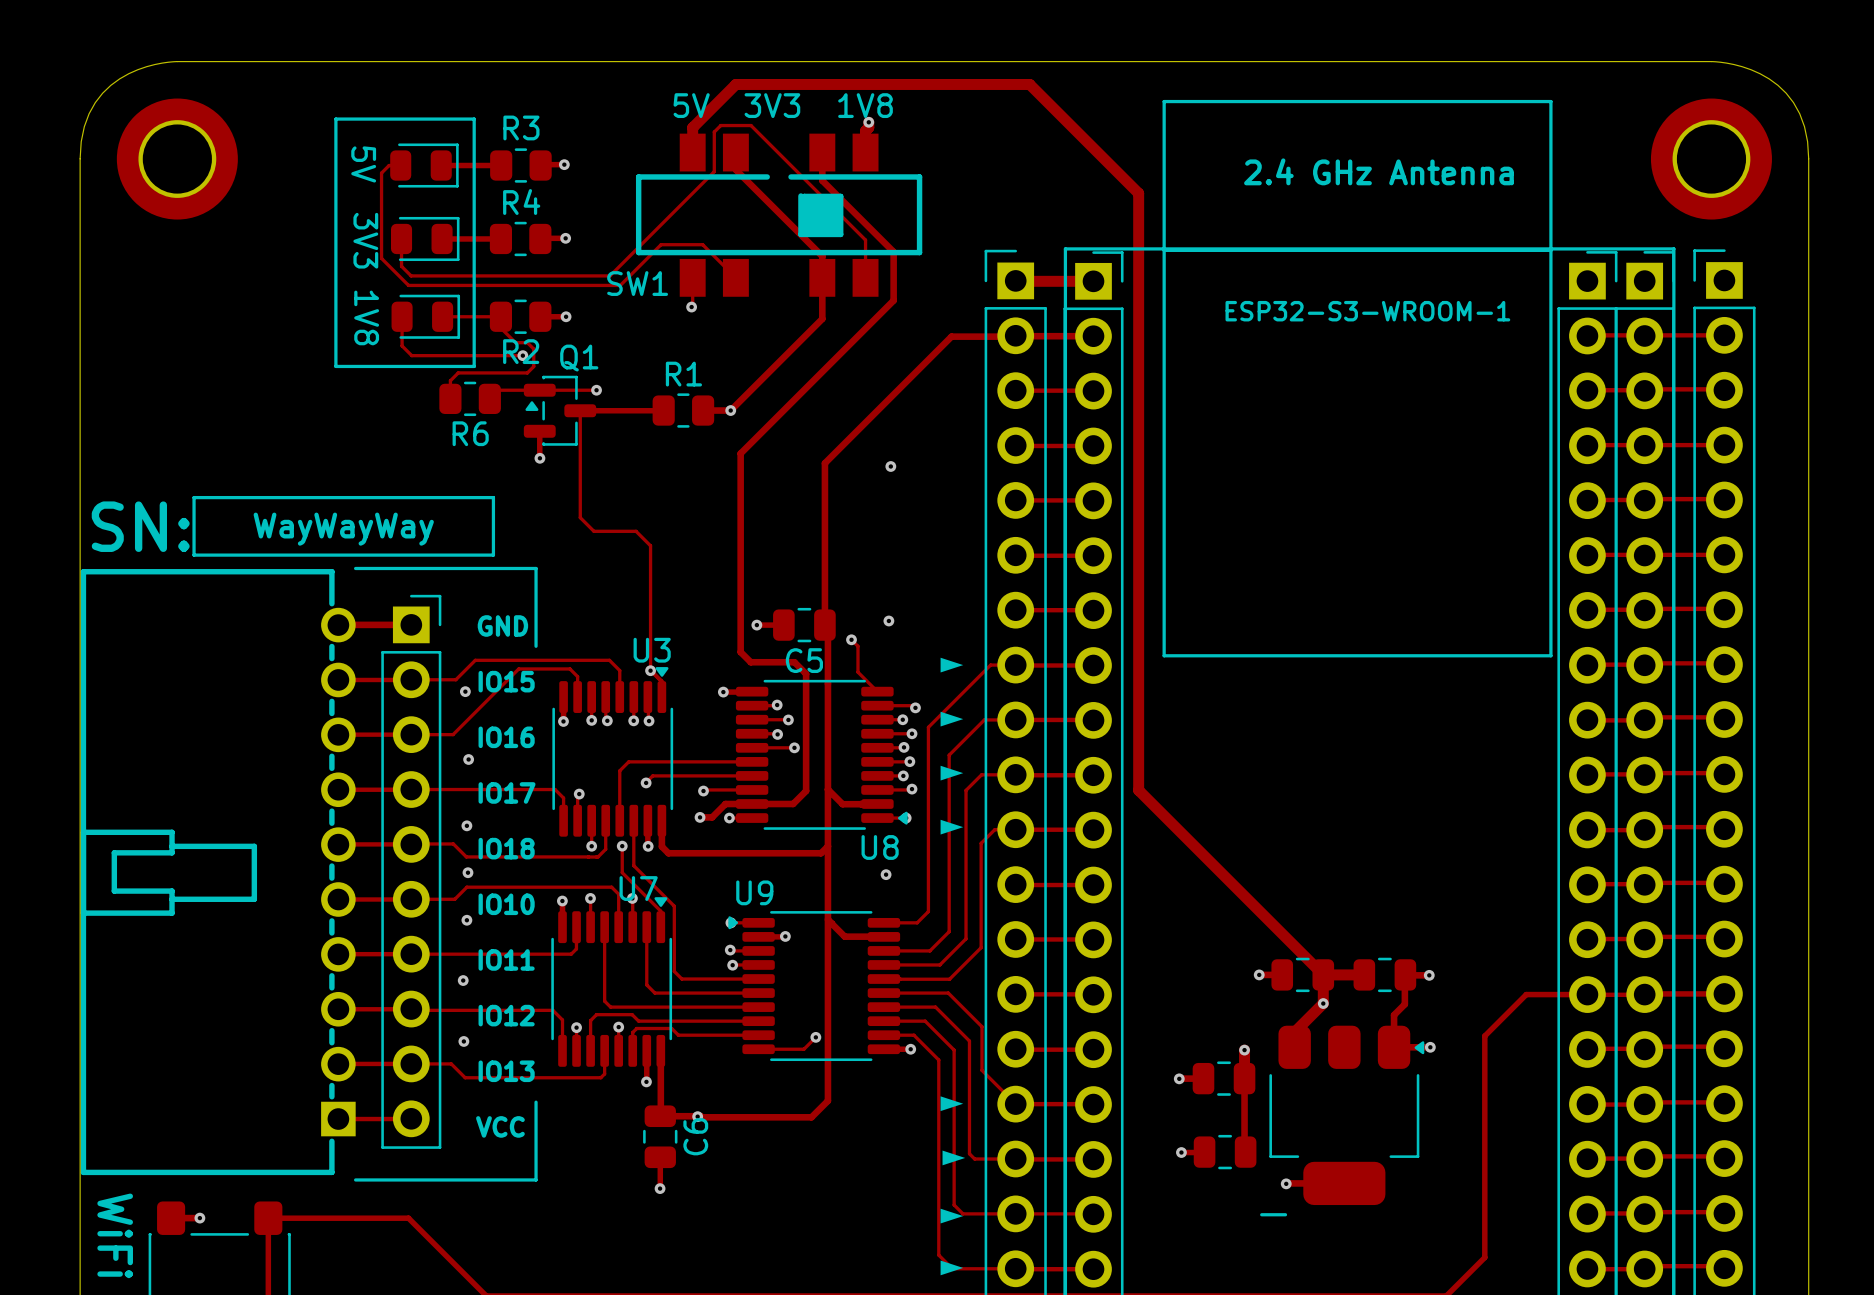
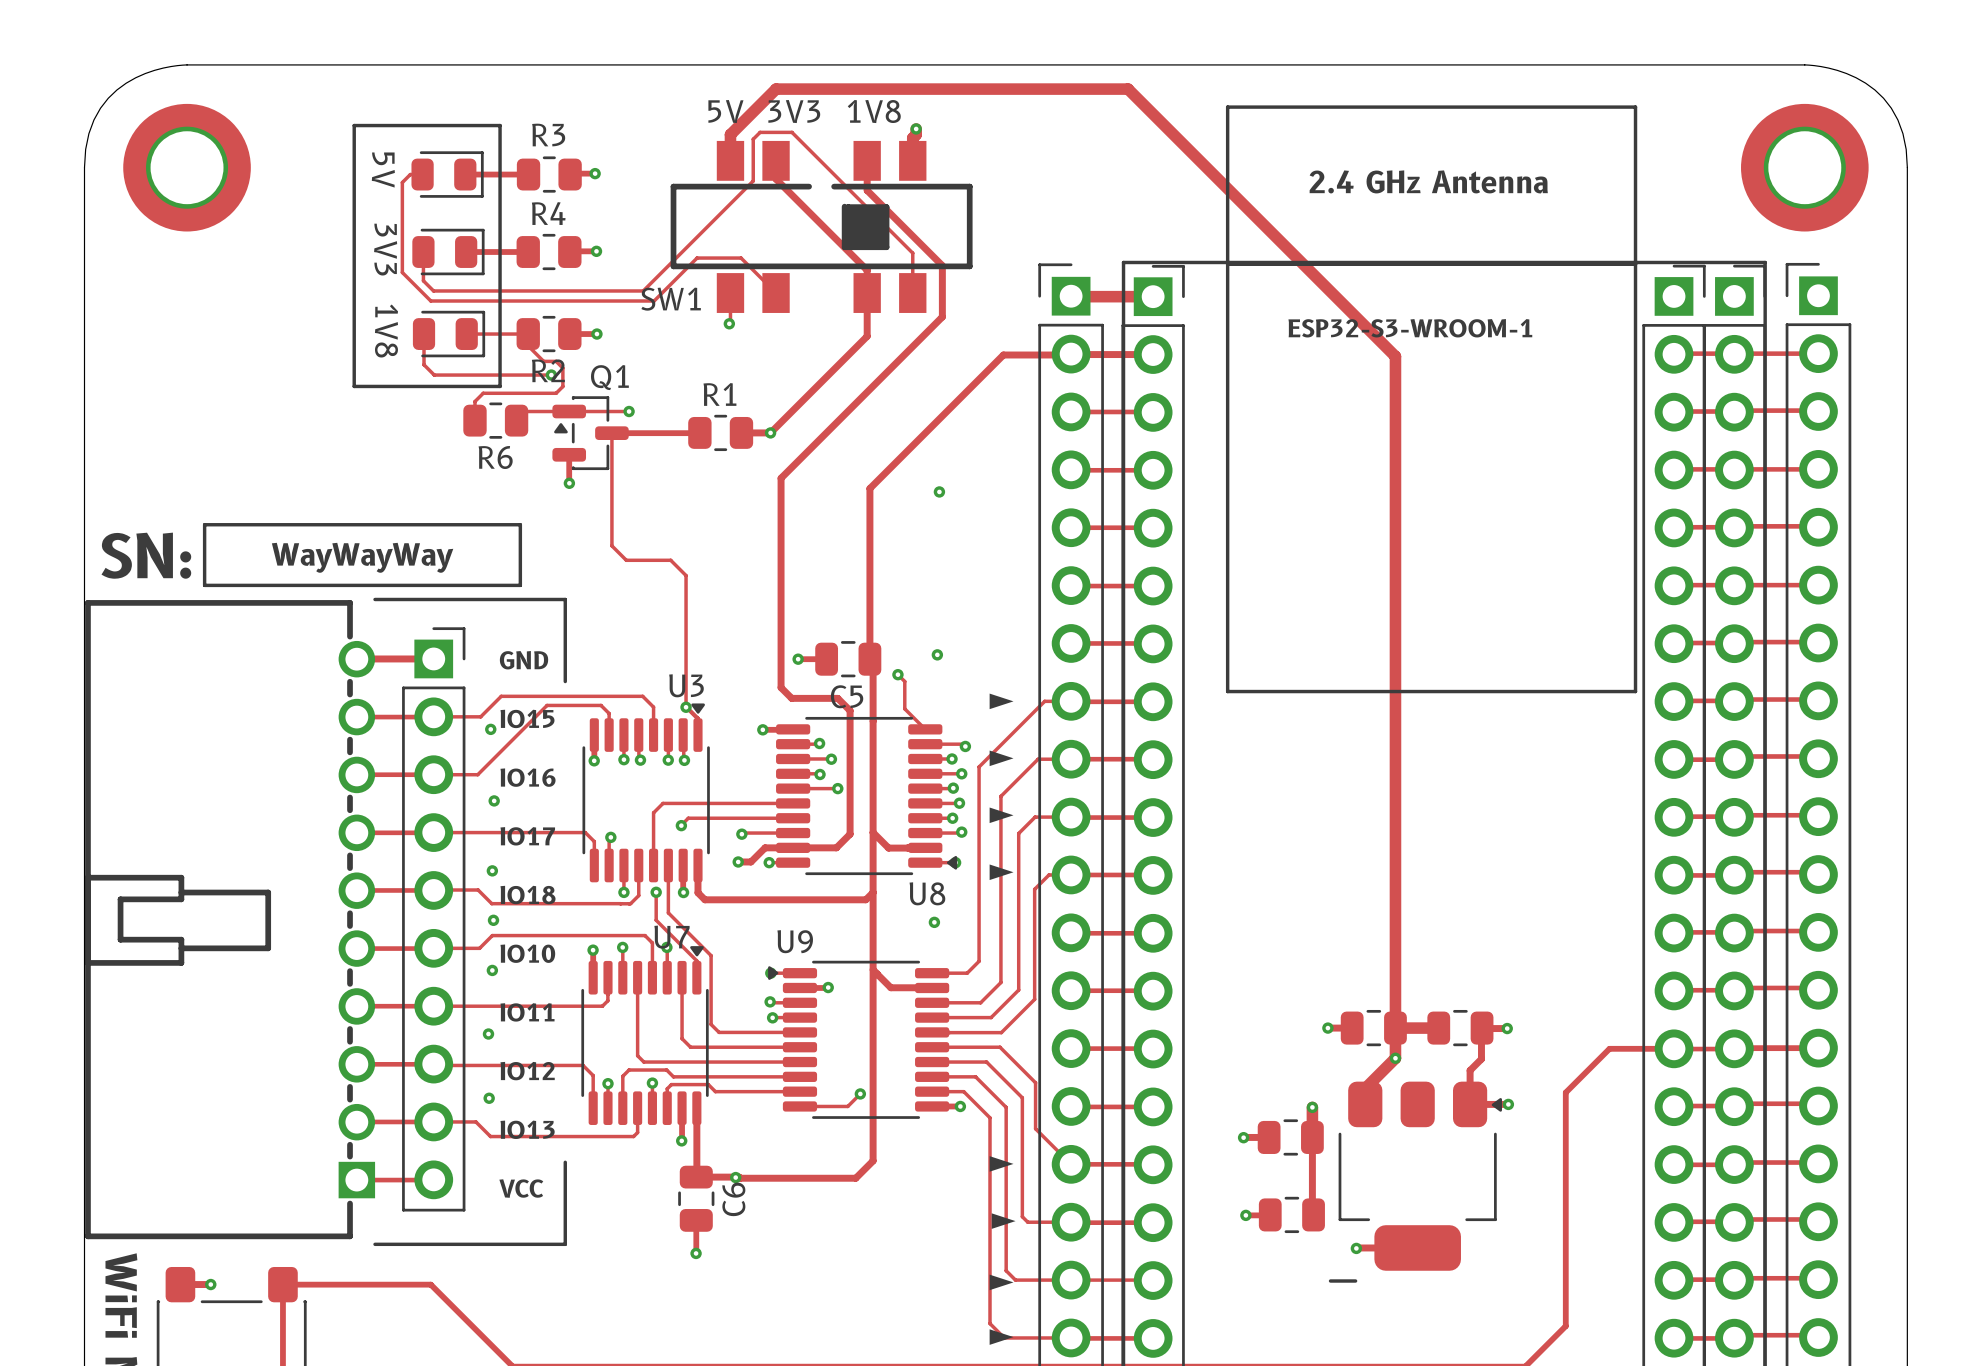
track: (1029, 84) (1138, 193) (1138, 790) (1323, 974) -> (1085, 89) (1128, 89) (1395, 356) (1395, 1028)

